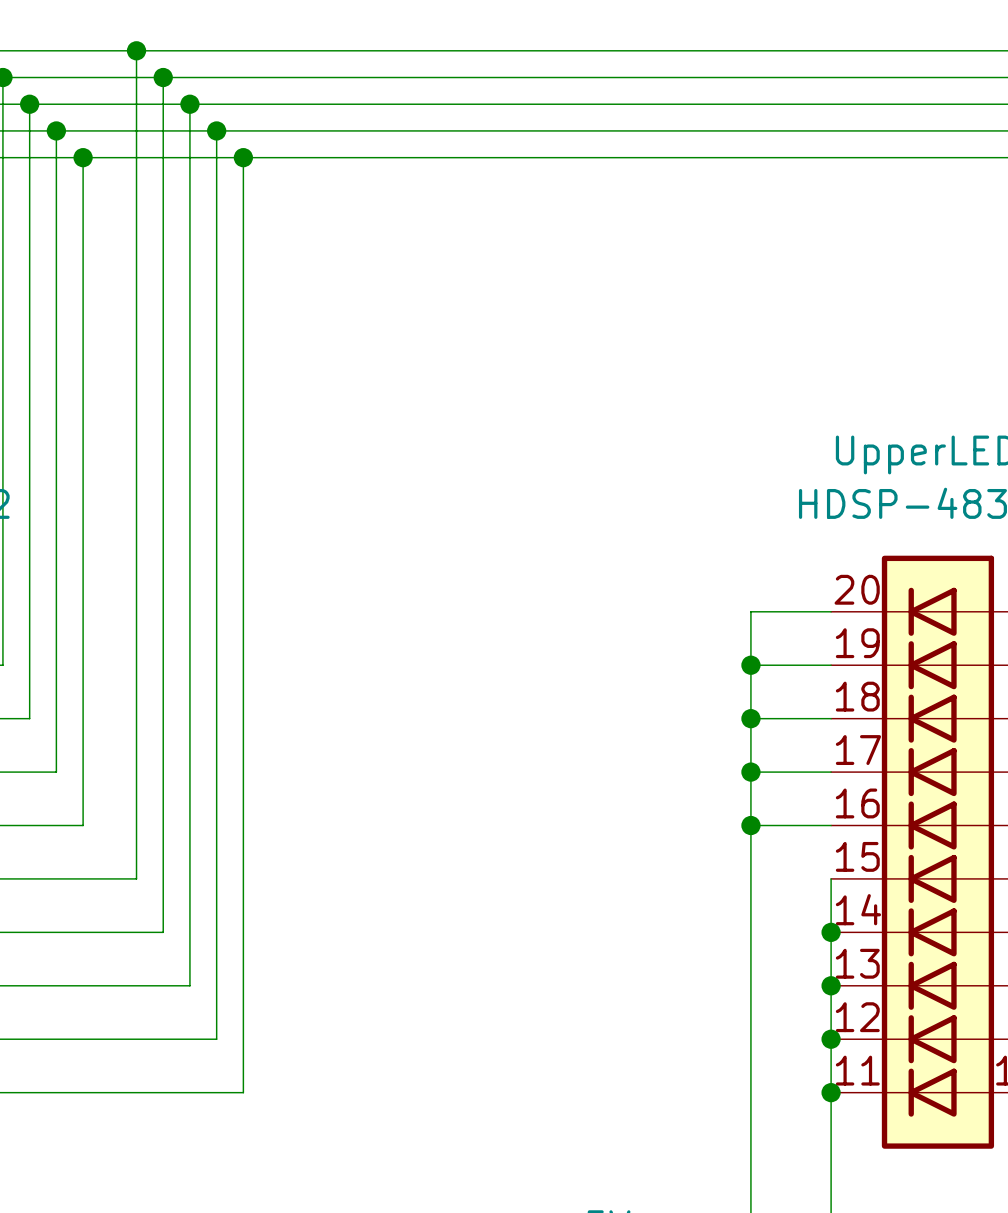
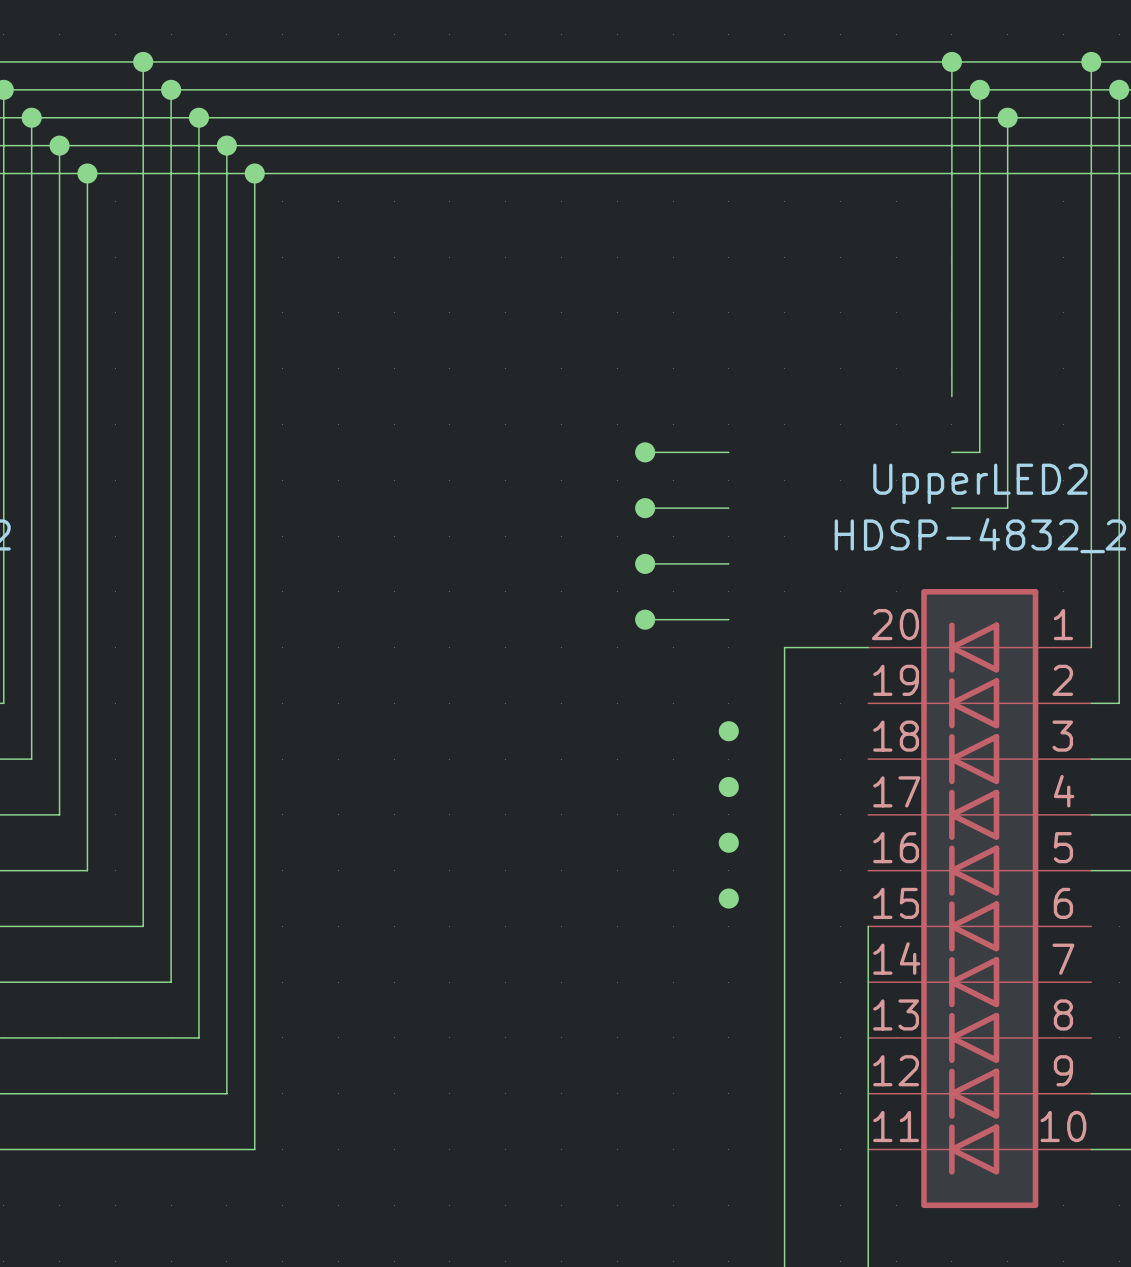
wire: none -> (951, 61) (951, 396)
junction: none -> (951, 61)
wire: none -> (979, 89) (979, 452) (951, 452)
junction: none -> (979, 89)
wire: none -> (1007, 117) (1007, 508) (951, 508)
junction: none -> (1007, 117)
junction: none -> (645, 452)
junction: none -> (645, 508)
junction: none -> (645, 563)
junction: none -> (645, 619)
wire: (750, 665) (831, 665) -> (645, 452) (728, 452)
junction: (750, 665) -> none
junction: none -> (728, 731)
wire: (750, 718) (831, 718) -> (645, 508) (728, 508)
junction: (750, 718) -> none
junction: none -> (728, 786)
wire: (750, 772) (831, 772) -> (645, 563) (728, 563)
junction: (750, 772) -> none
junction: none -> (728, 842)
wire: (750, 825) (831, 825) -> (645, 619) (728, 619)
junction: (750, 825) -> none
junction: none -> (728, 898)
junction: (831, 932) -> none
junction: (831, 985) -> none
junction: (831, 1039) -> none
junction: (831, 1092) -> none

